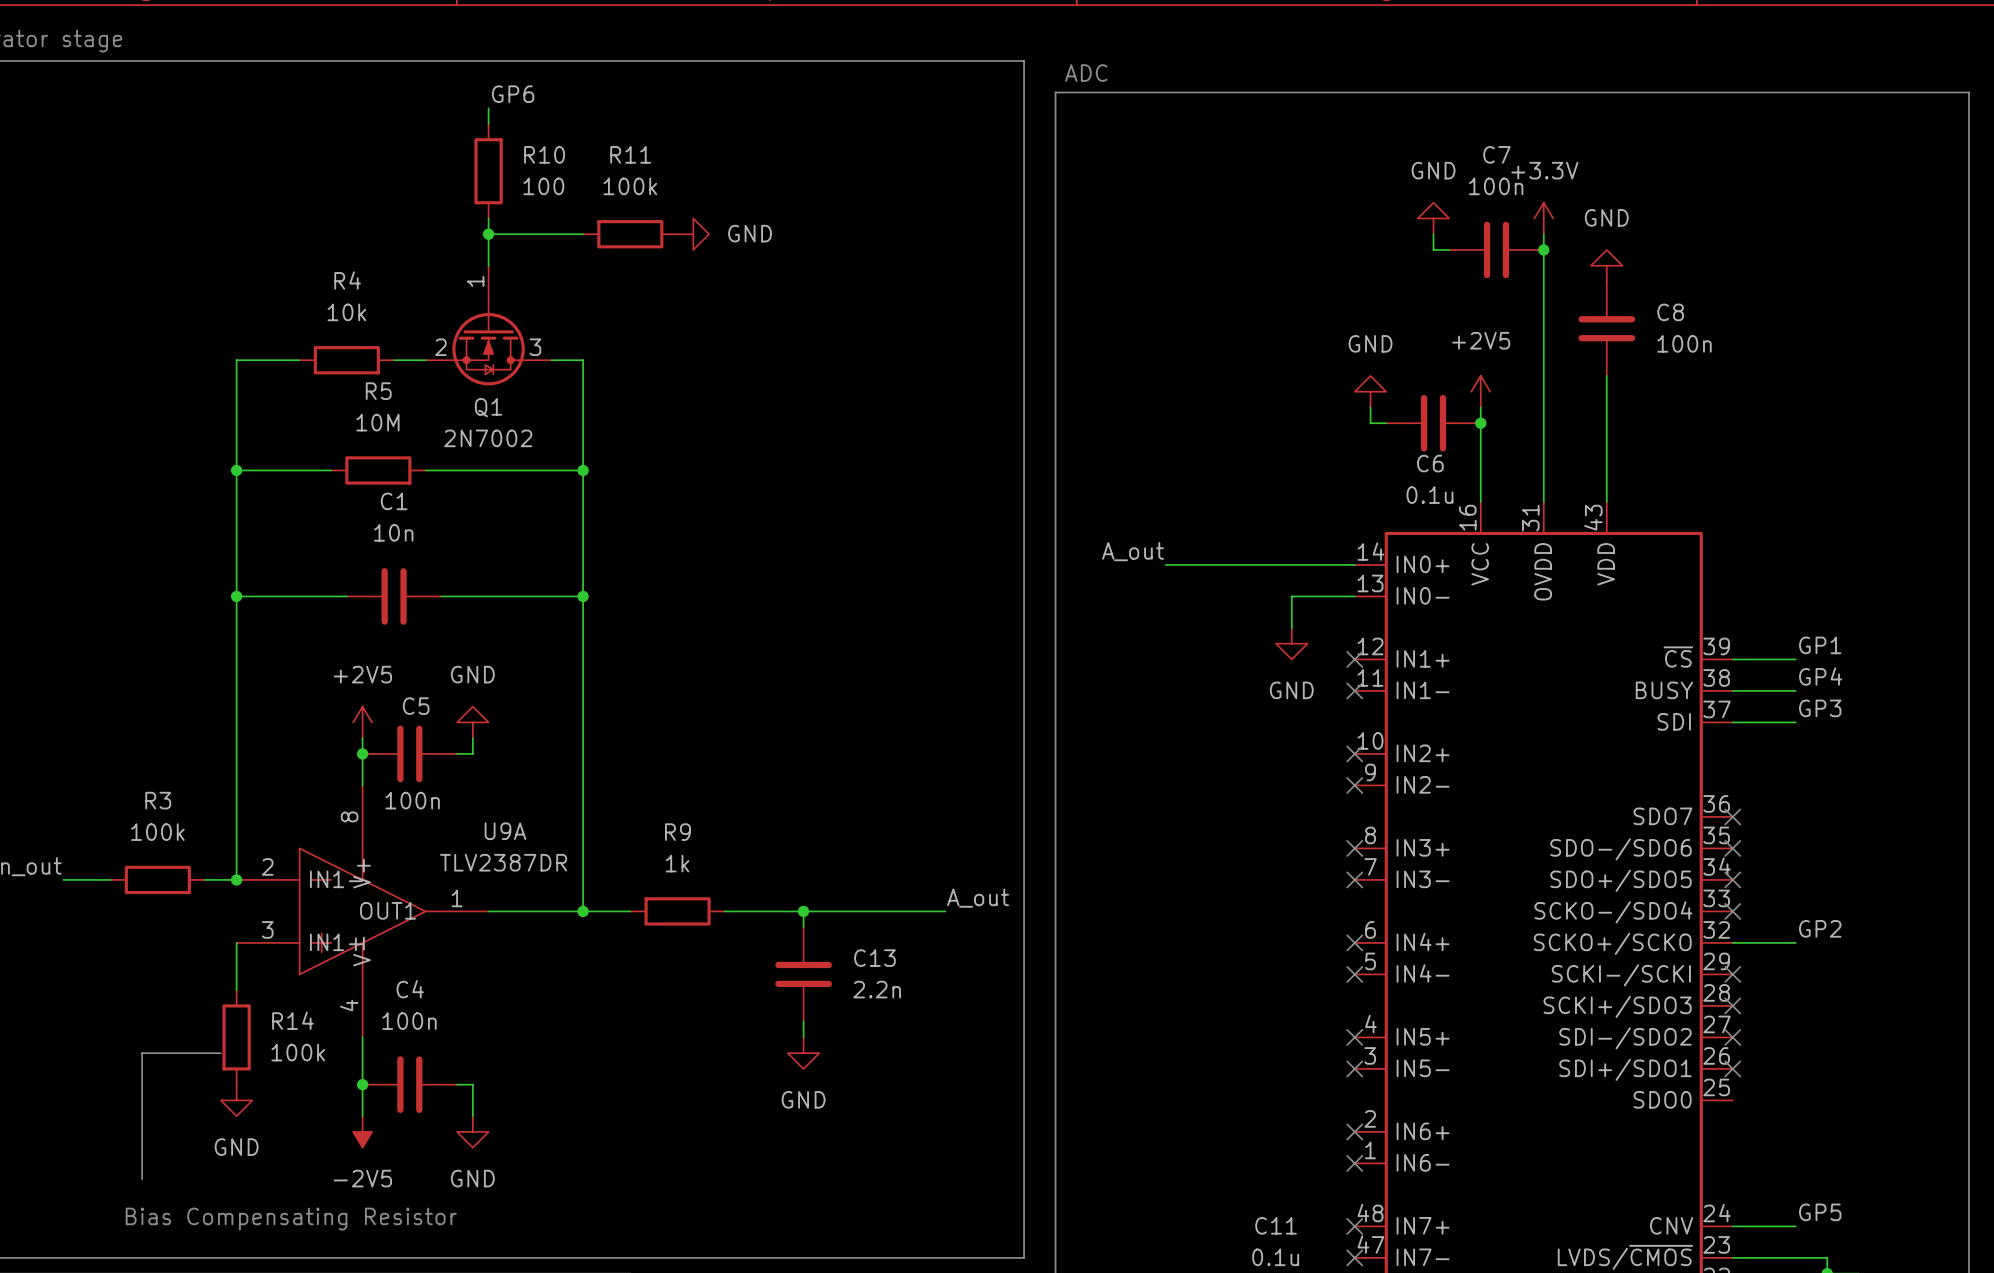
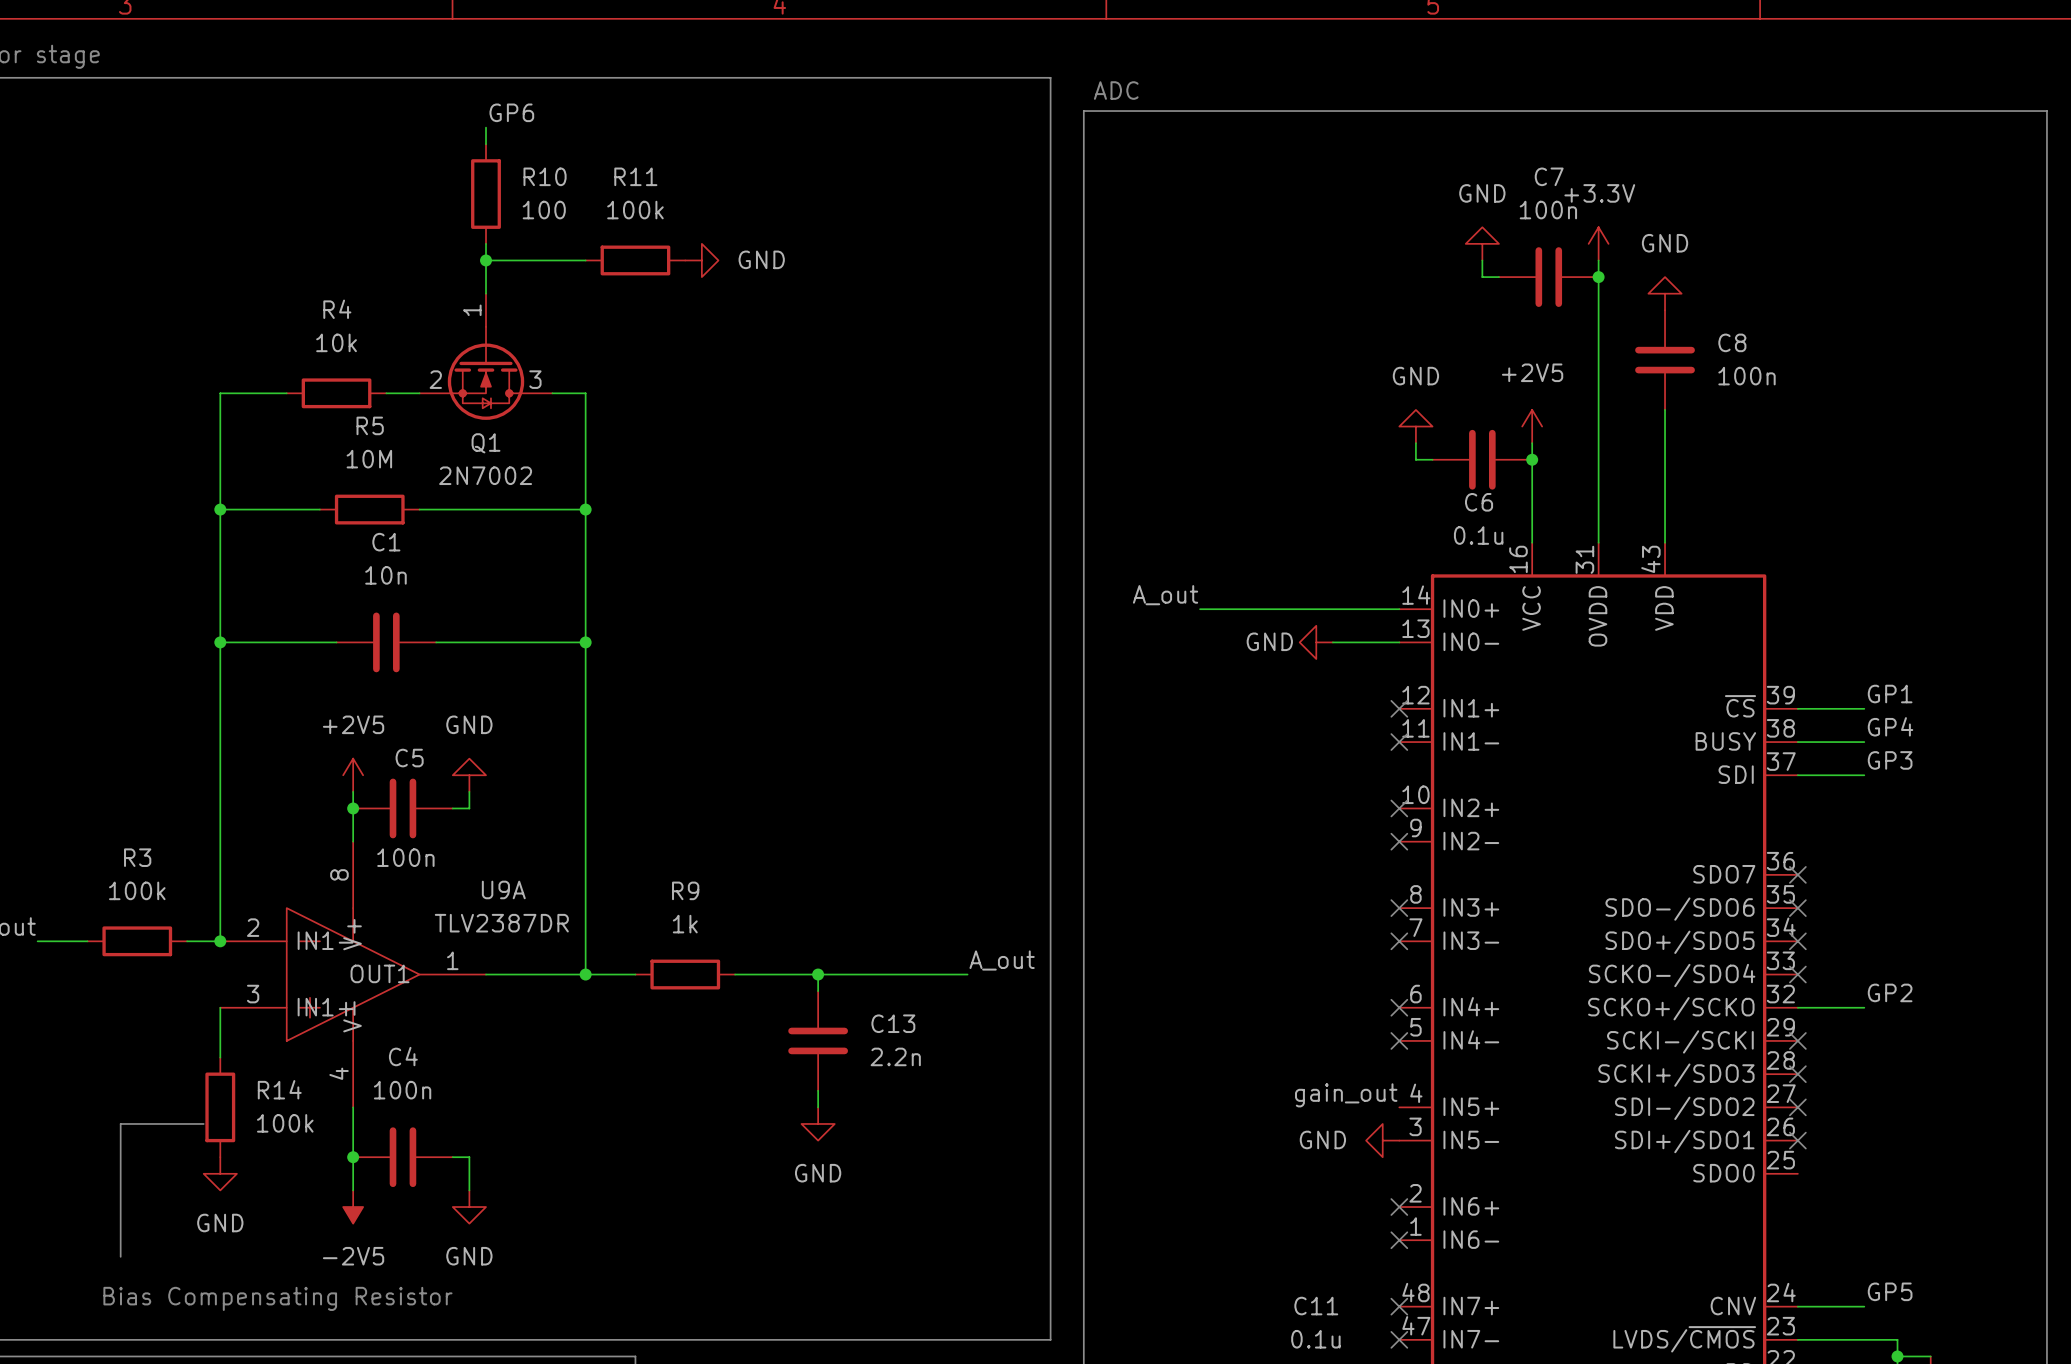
wire: (1291, 596) (1291, 627) -> none
power symbol rotation: 0° (1291, 643) -> 90° clockwise (1316, 642)
power symbol position: GND (1291, 643) -> GND (1316, 642)
label: none -> gain_out (1346, 1095)
no-connect mark: (1354, 1037) -> none
power symbol: none -> GND (1382, 1140)
no-connect mark: (1354, 1068) -> none

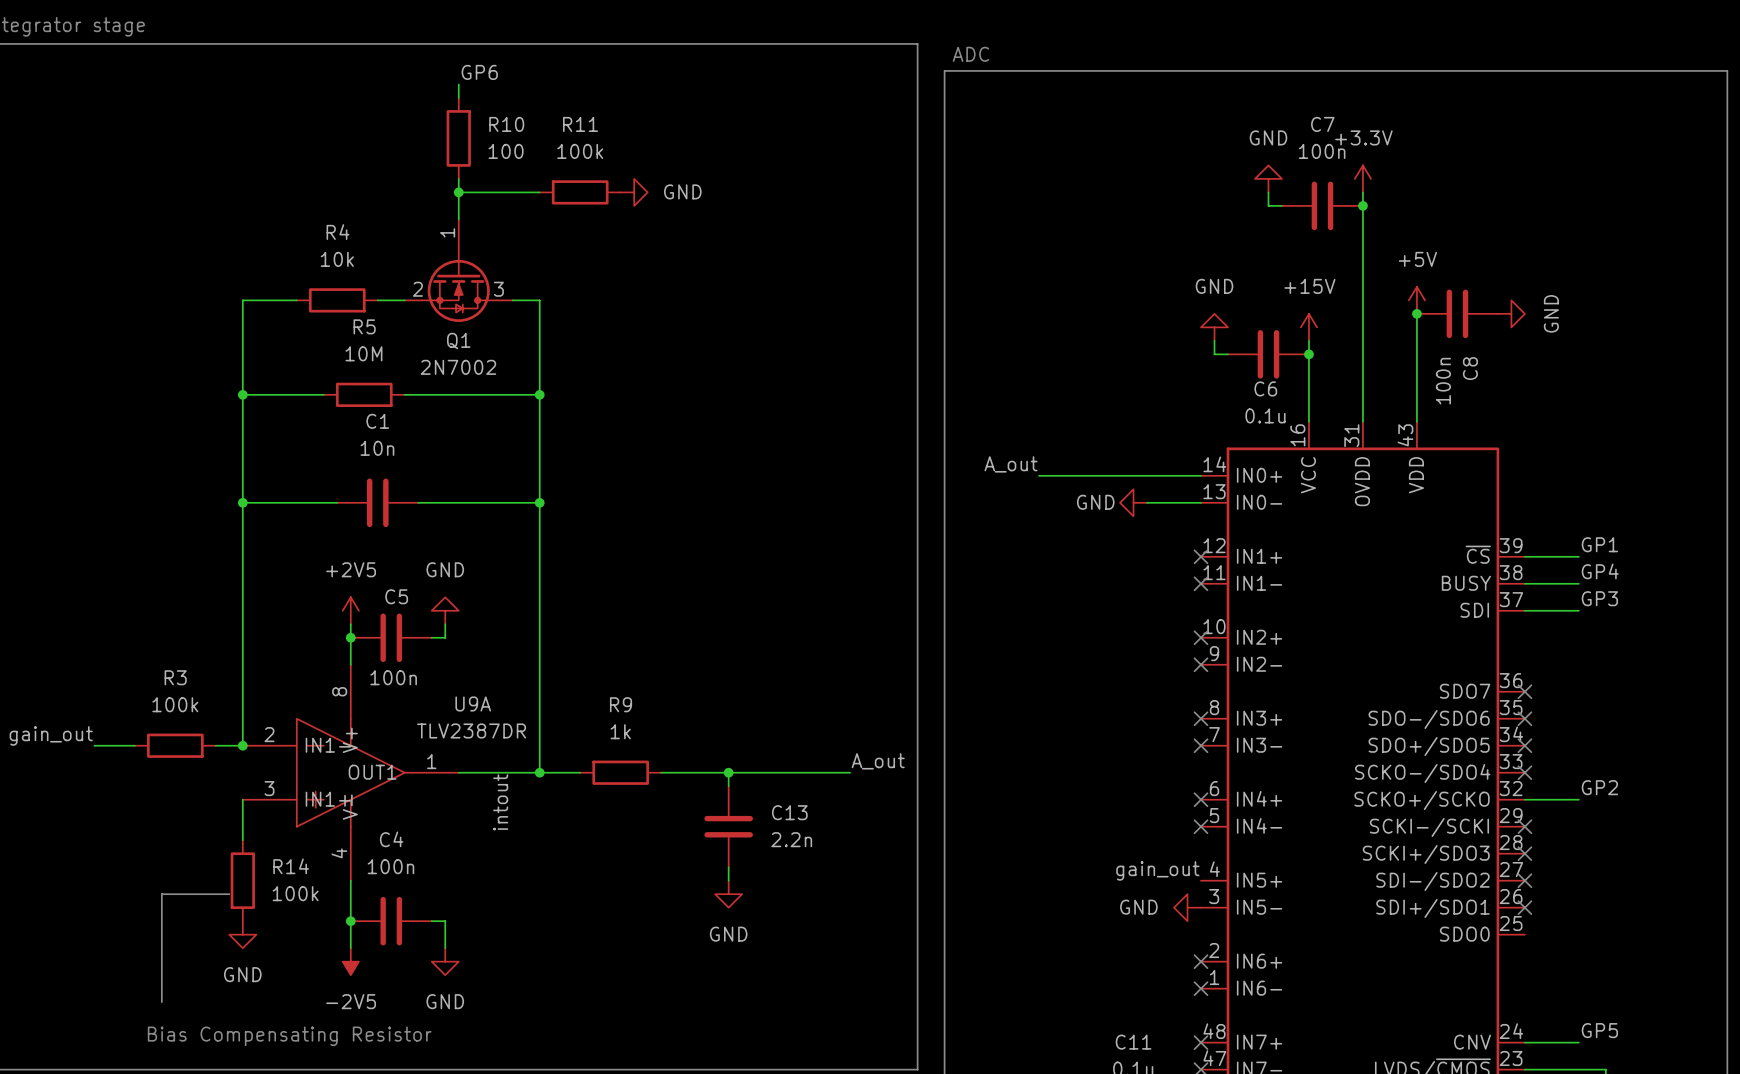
power symbol rotation: 0° (1665, 293) -> 90° clockwise (1511, 313)
power symbol position: GND (1665, 293) -> GND (1511, 313)
C8 rotation: 0° (1665, 360) -> 90° clockwise (1457, 313)
C8 position: (1665, 360) -> (1457, 313)
power symbol: none -> +5V (1416, 300)
junction: none -> (1416, 313)
power symbol: +2V5 (1532, 426) -> +15V (1308, 327)
label: none -> intout (500, 802)

